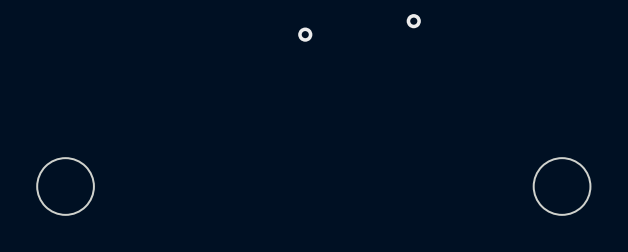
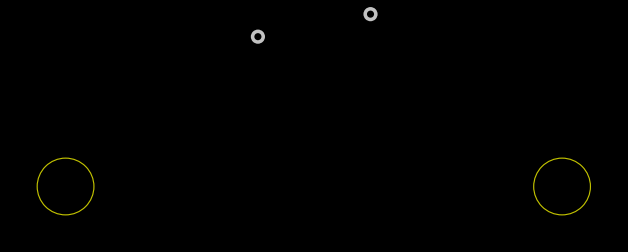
via: none -> (370, 14)
via: (413, 21) -> none
via: (305, 34) -> none
via: none -> (257, 36)

